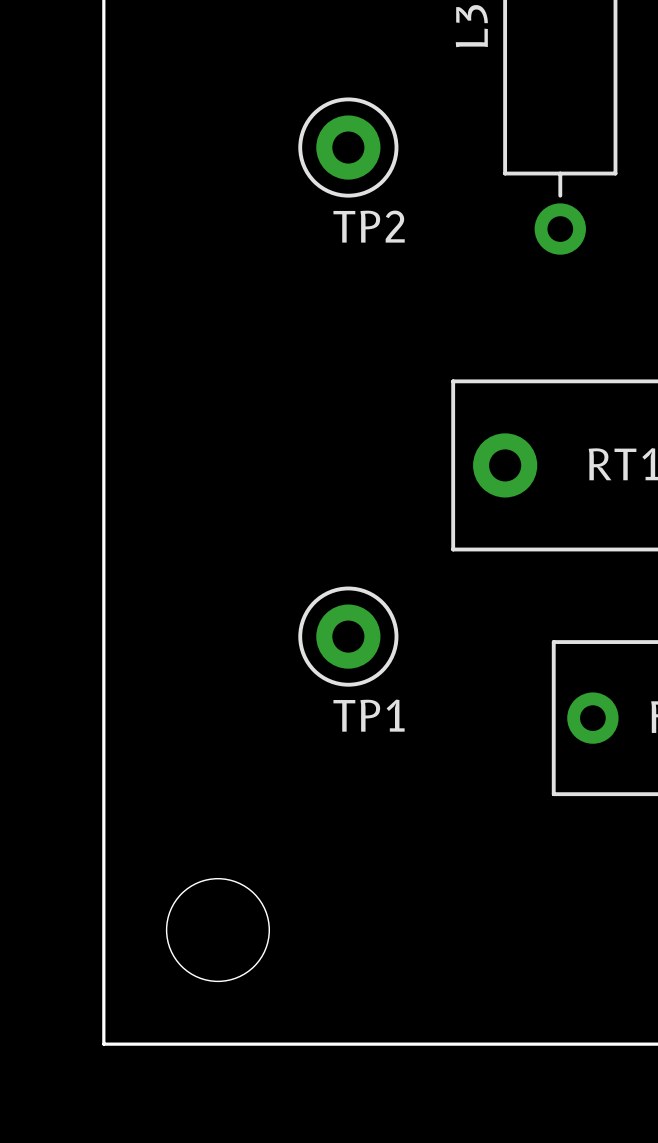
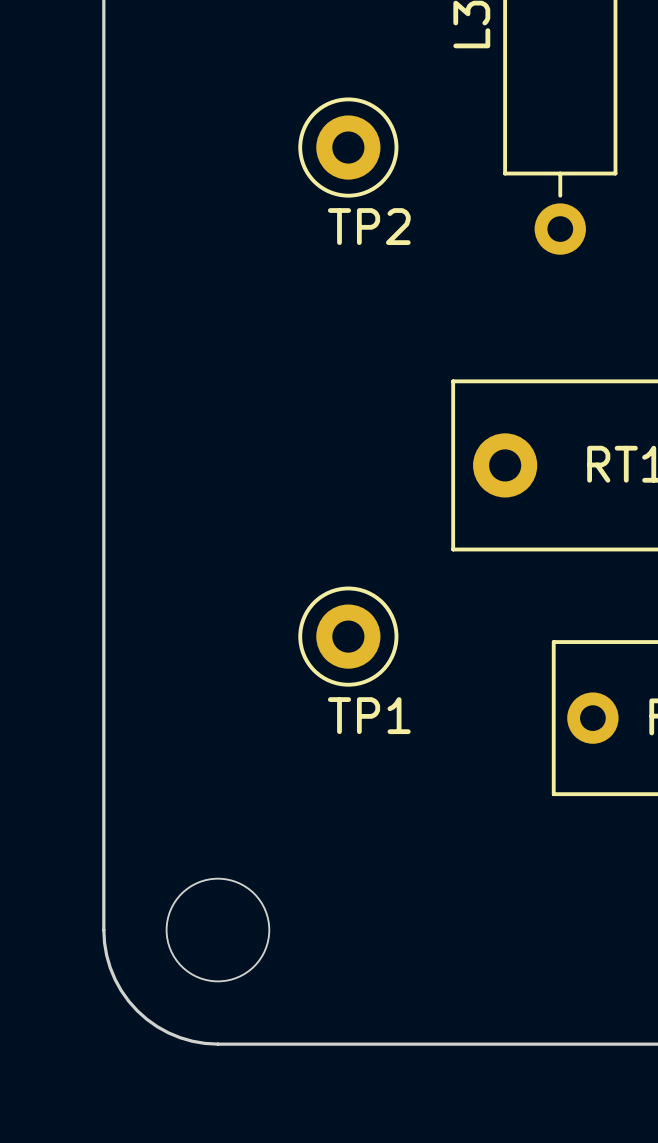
board edge: (103, 930) (103, 1044) (217, 1044) -> (103, 930) (106, 955) (115, 979) (137, 1010) (157, 1026) (180, 1037) (217, 1044)

